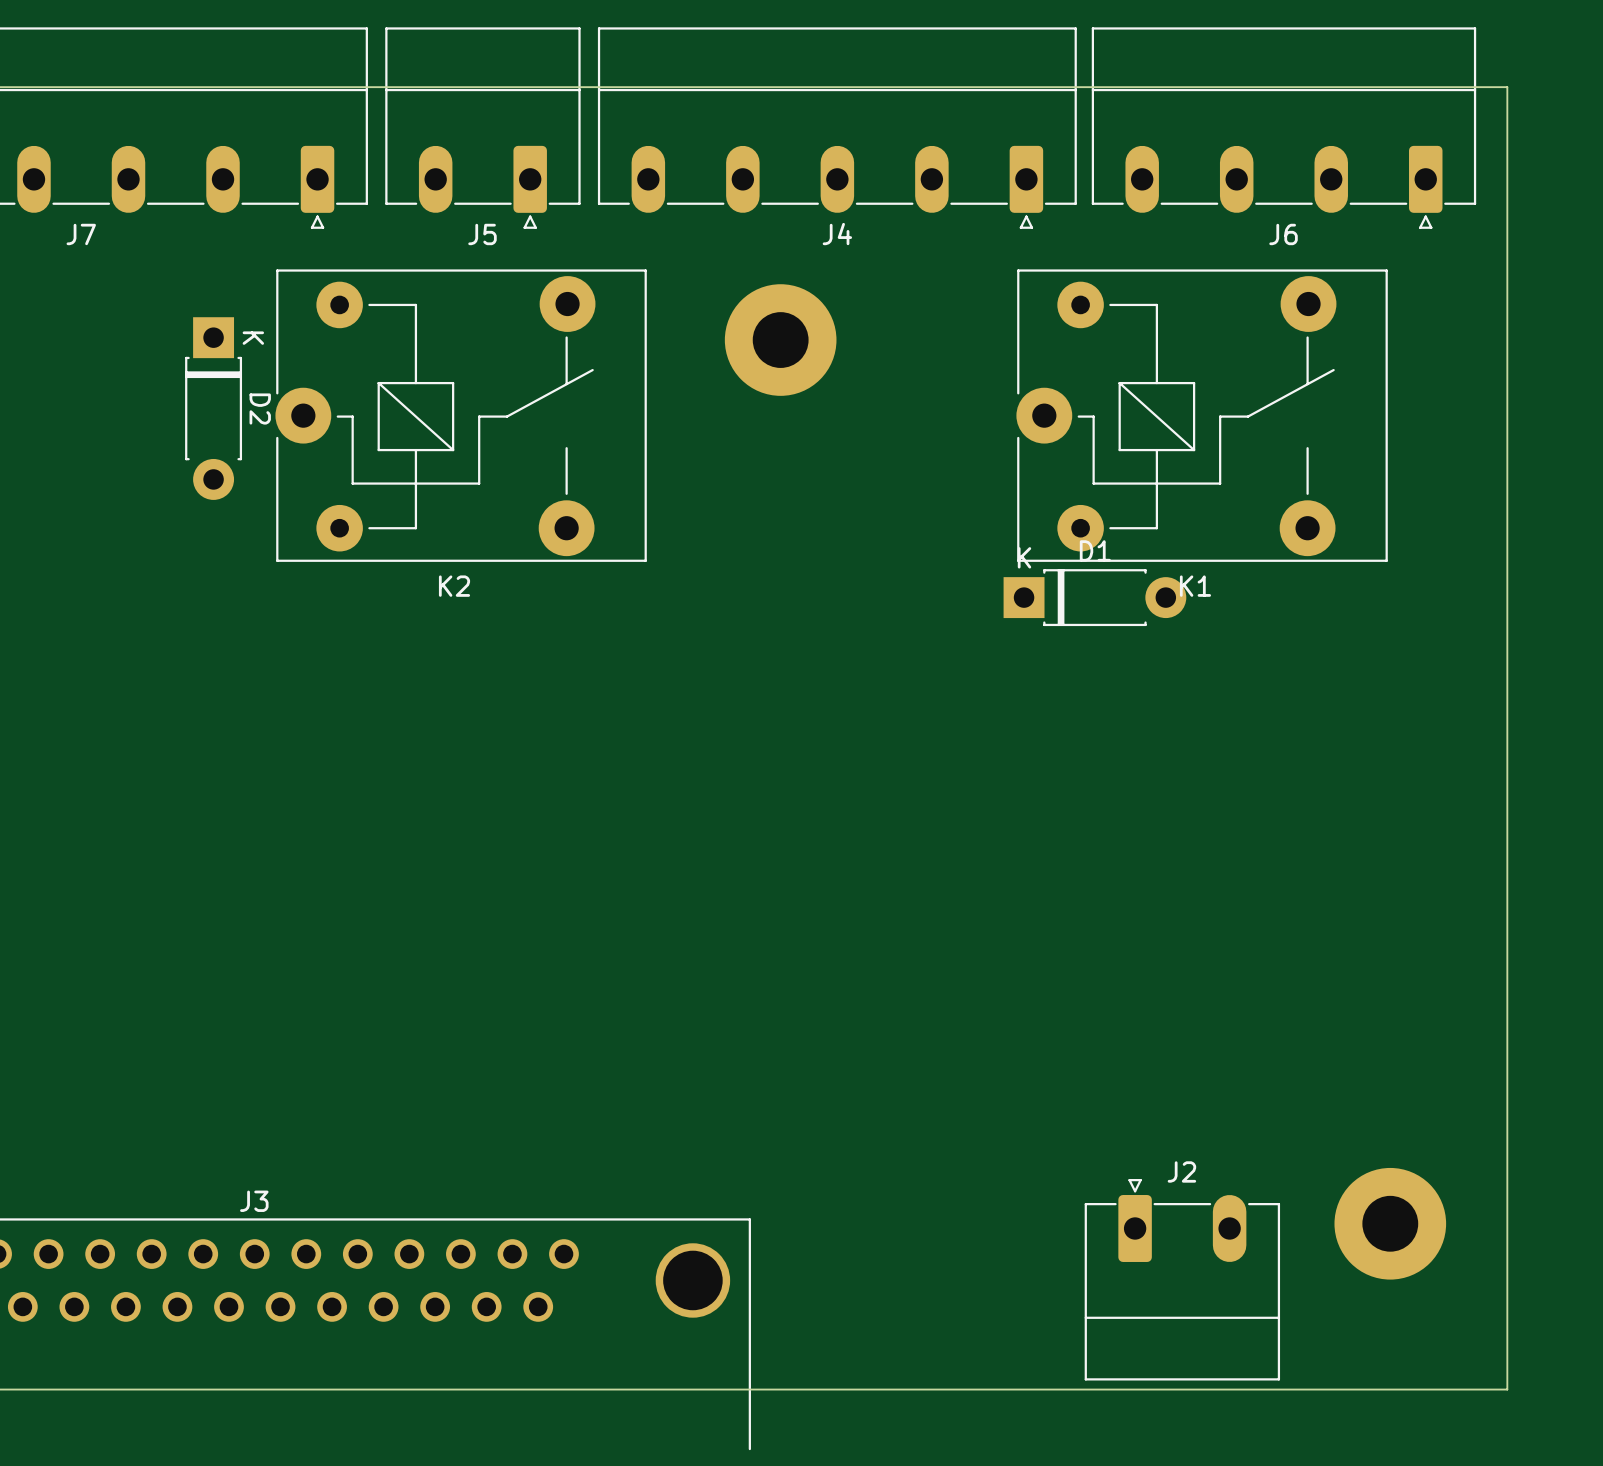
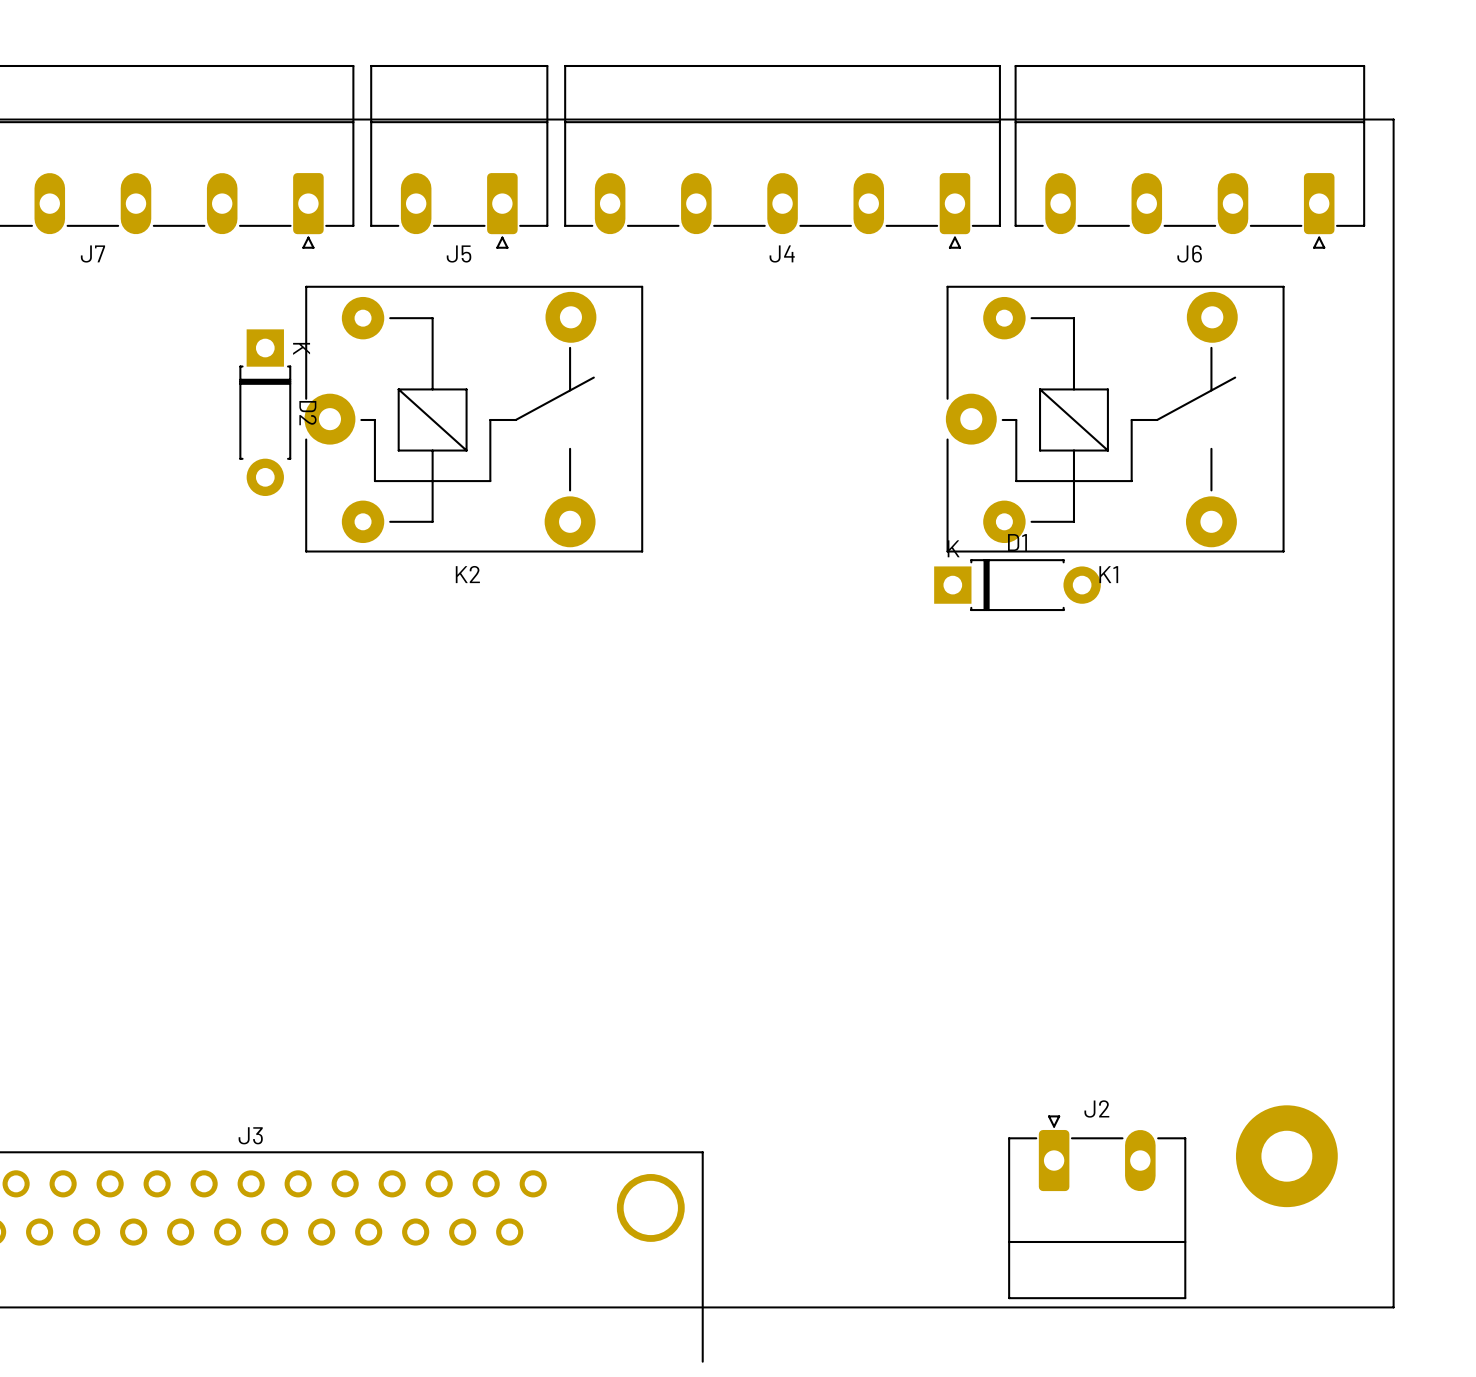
part: (780, 340) -> none
D2 position: (213, 408) -> (265, 412)
K2 position: (461, 415) -> (473, 419)

